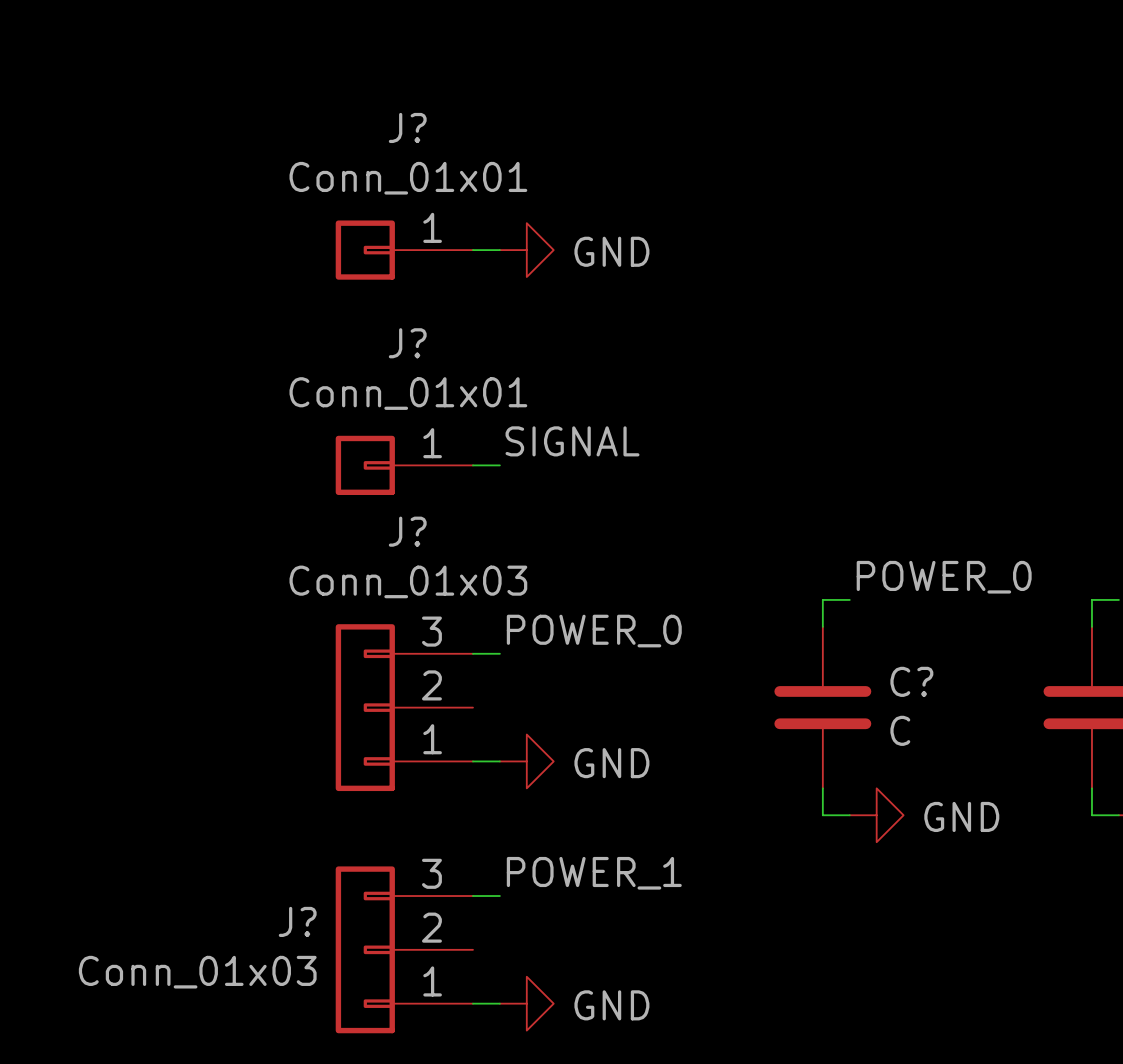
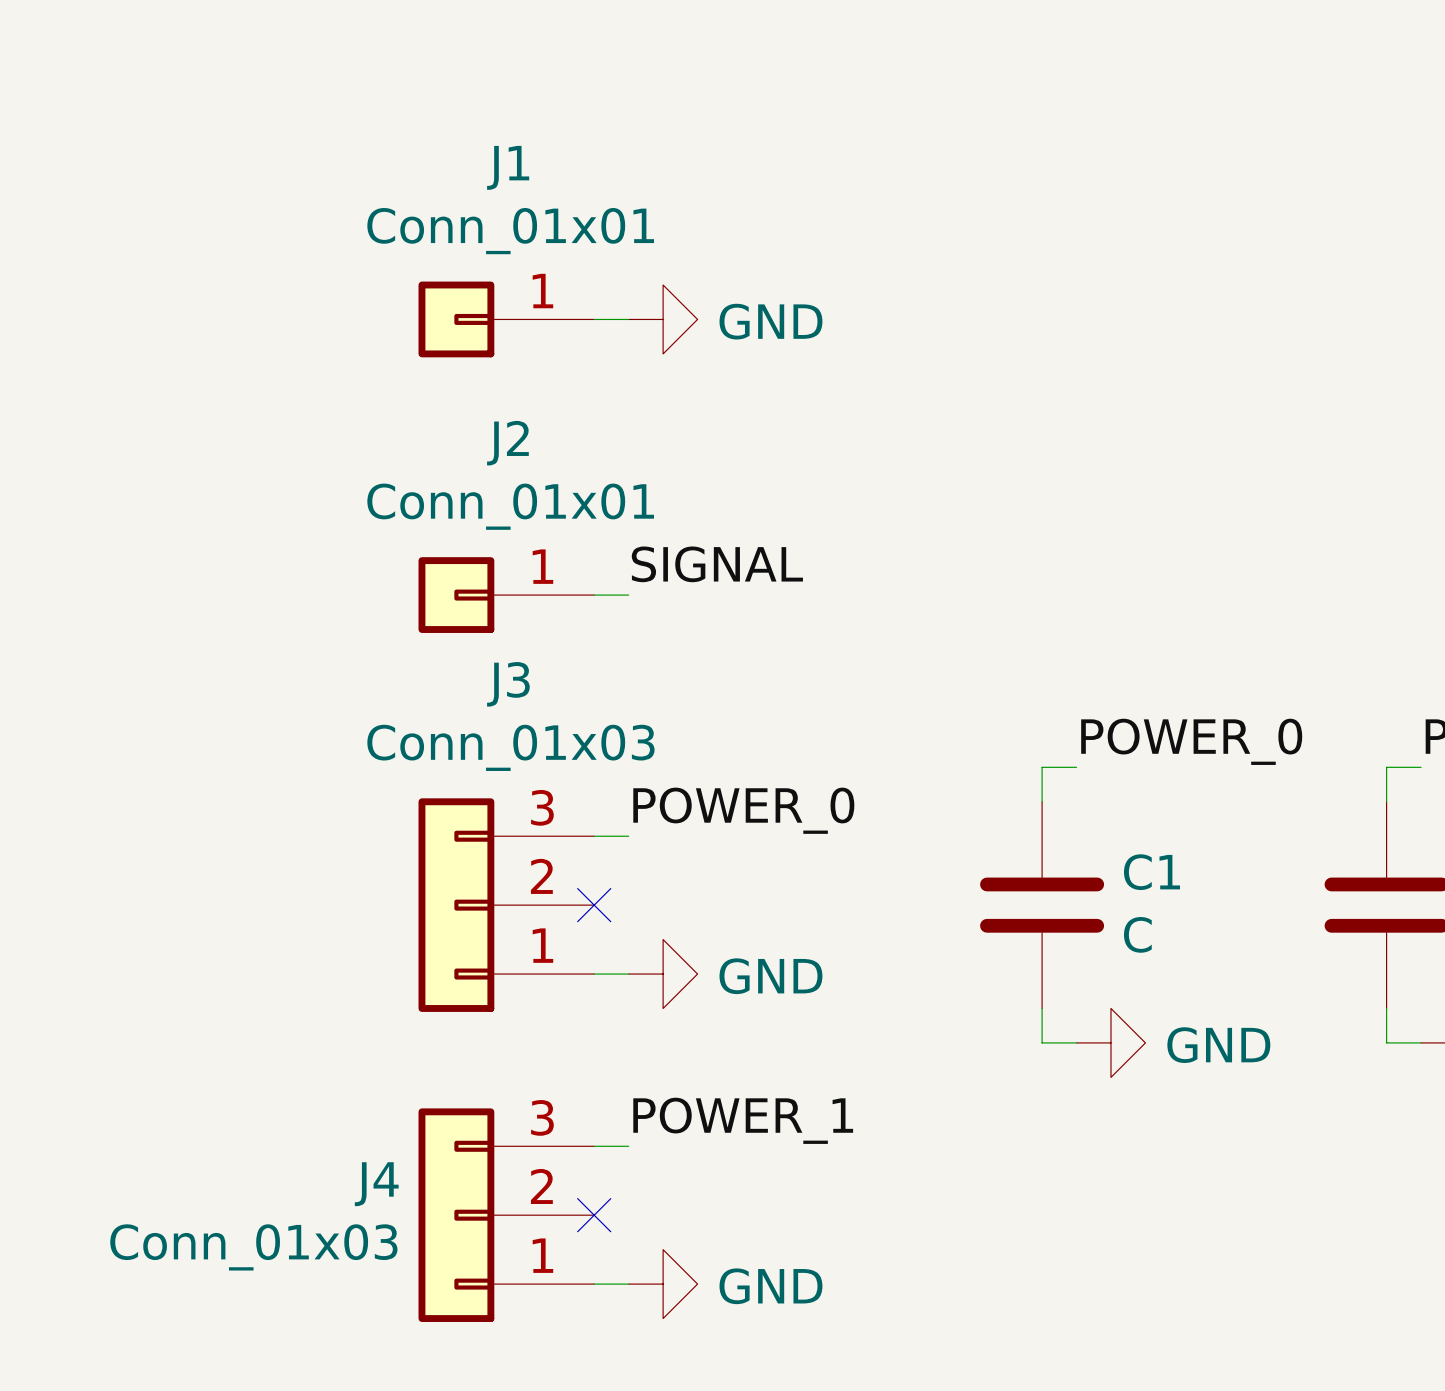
J? name: J? (407, 127) -> J1 (508, 167)
J? name: J? (407, 343) -> J2 (507, 443)
J? name: J? (407, 531) -> J3 (508, 684)
C? name: C? (911, 681) -> C1 (1151, 872)
no-connect mark: none -> (594, 905)
J? name: J? (297, 921) -> J4 (376, 1184)
no-connect mark: none -> (594, 1215)

